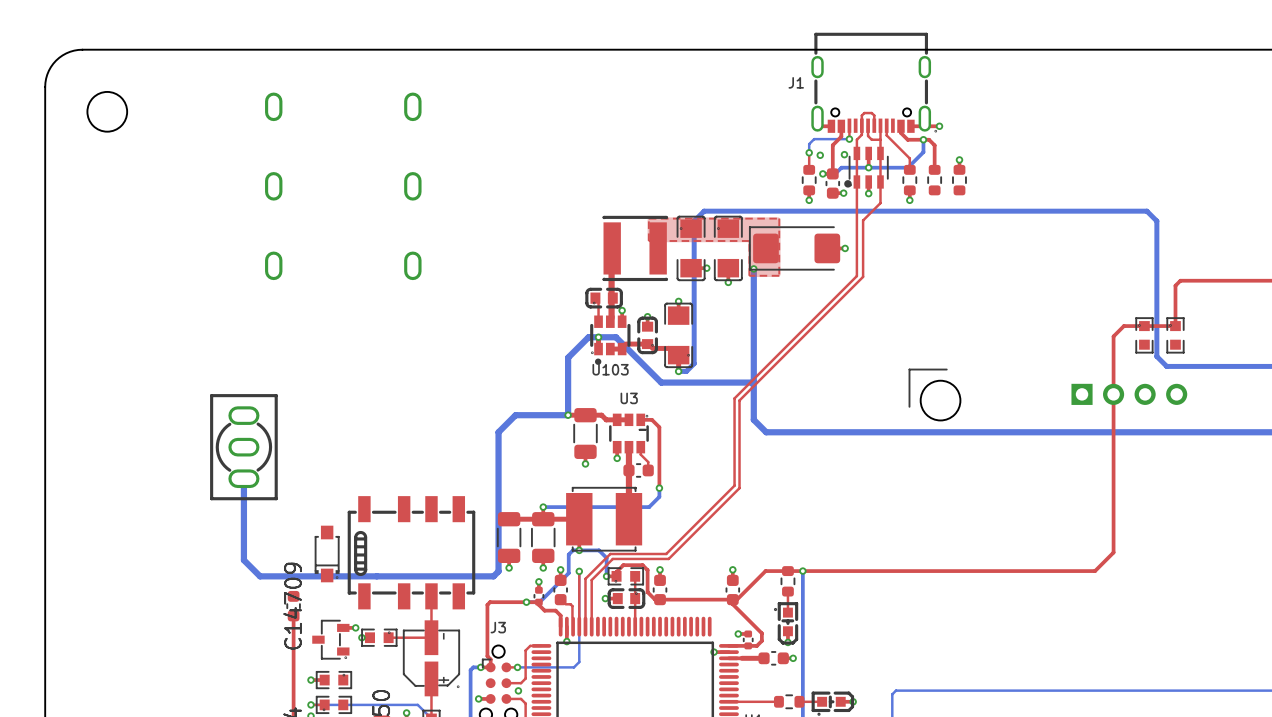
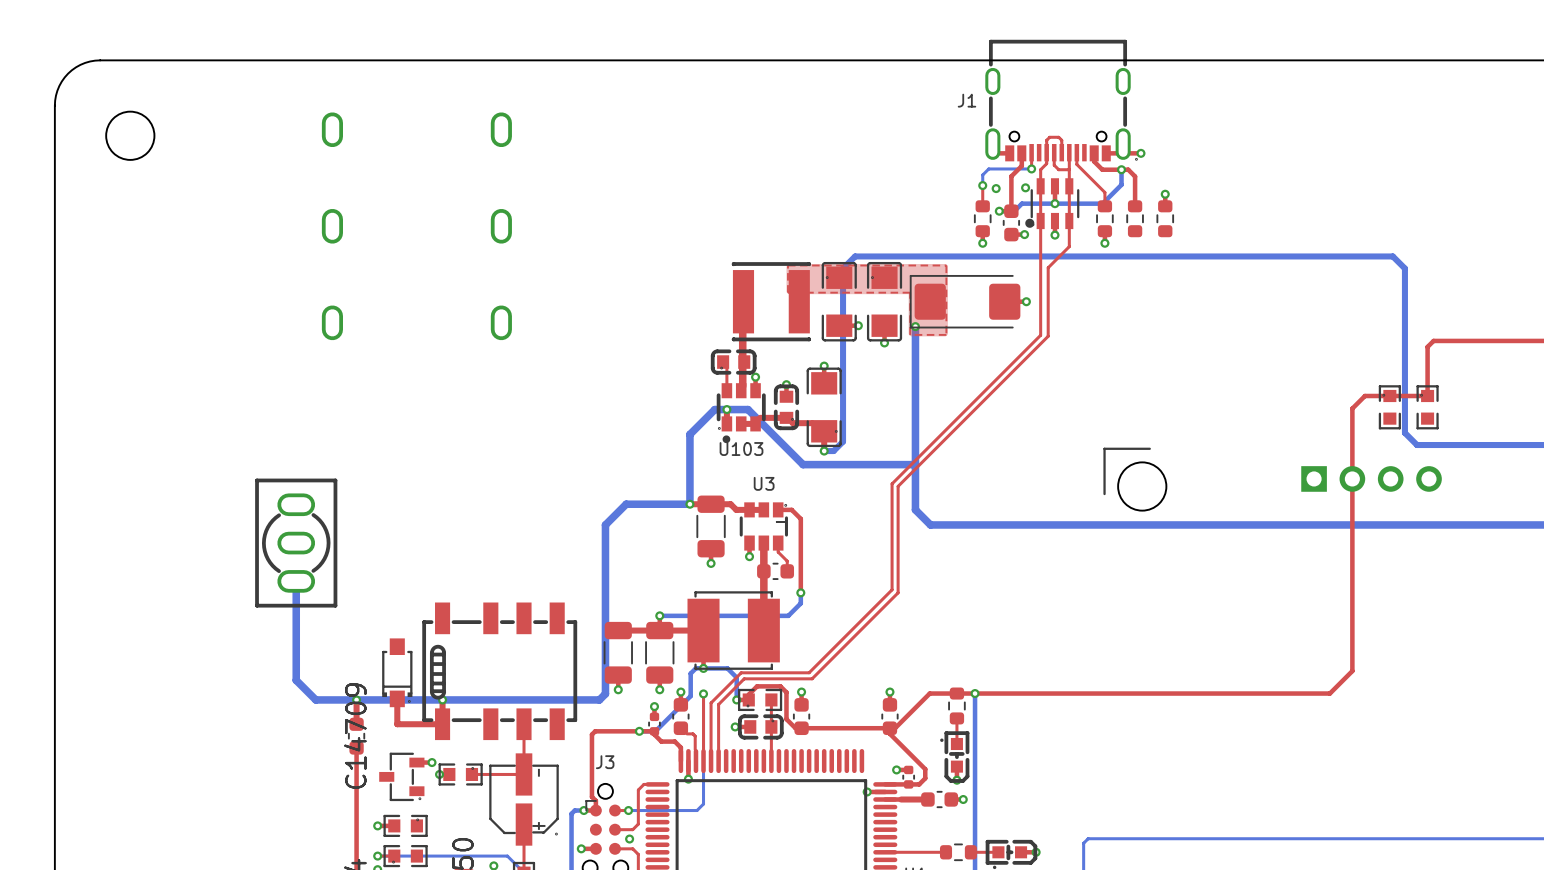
top track: none -> (397, 698) (397, 724) (442, 724) (442, 699)
top track: none -> (356, 699) (356, 724)
via: none -> (356, 699)
via: none -> (442, 699)

